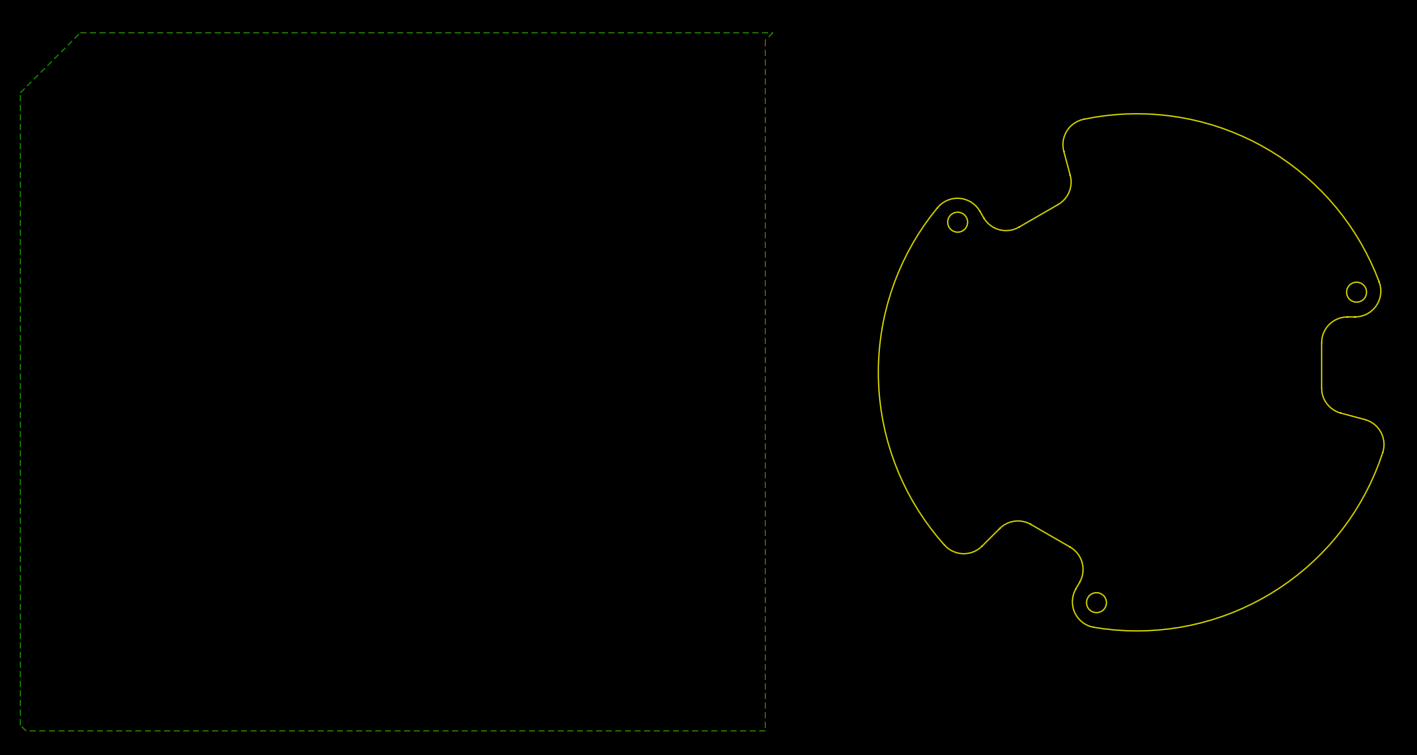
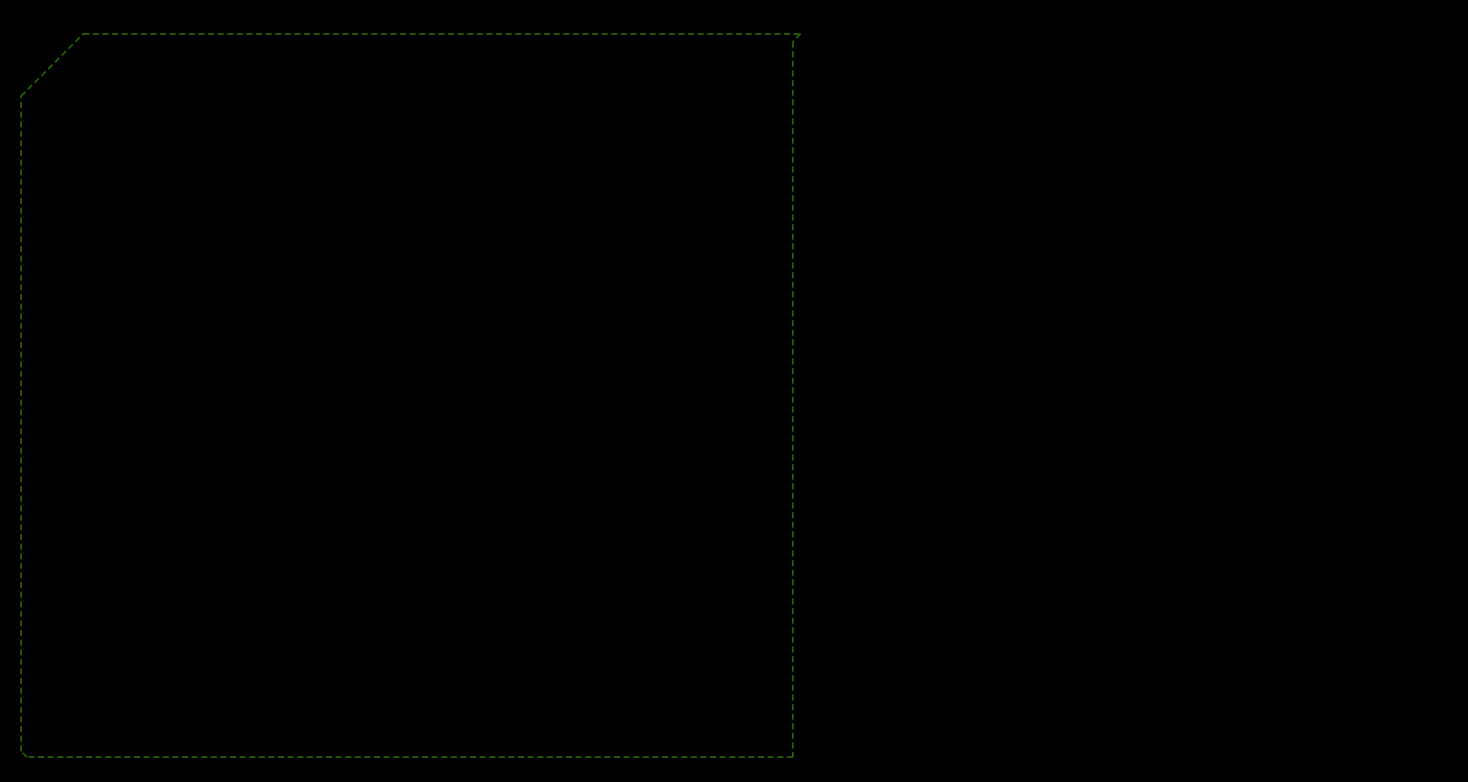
board edge: (1083, 119) (1126, 113) (1169, 115) (1211, 124) (1261, 145) (1305, 176) (1336, 207) (1360, 242) (1380, 285) (1380, 297) (1372, 310) (1361, 316) (1344, 317) (1334, 320) (1325, 329) (1321, 339) (1321, 390) (1325, 401) (1335, 411) (1372, 423) (1379, 429) (1383, 437) (1382, 452) (1360, 501) (1328, 545) (1288, 581) (1242, 608) (1190, 625) (1137, 630) (1104, 628) (1085, 624) (1076, 615) (1072, 603) (1073, 594) (1082, 574) (1080, 557) (1070, 547) (1025, 522) (1014, 521) (1006, 523) (979, 548) (971, 552) (960, 553) (949, 549) (924, 519) (907, 491) (894, 462) (885, 431) (878, 377) (882, 323) (898, 272) (918, 233) (939, 205) (953, 198) (962, 198) (971, 202) (990, 225) (1005, 230) (1018, 227) (1060, 202) (1067, 194) (1071, 183) (1063, 148) (1064, 136) (1070, 126) (1083, 119) -> none
round board edge: [946, 211, 969, 233] -> none
round board edge: [1345, 281, 1368, 303] -> none
round board edge: [1085, 591, 1108, 614] -> none

